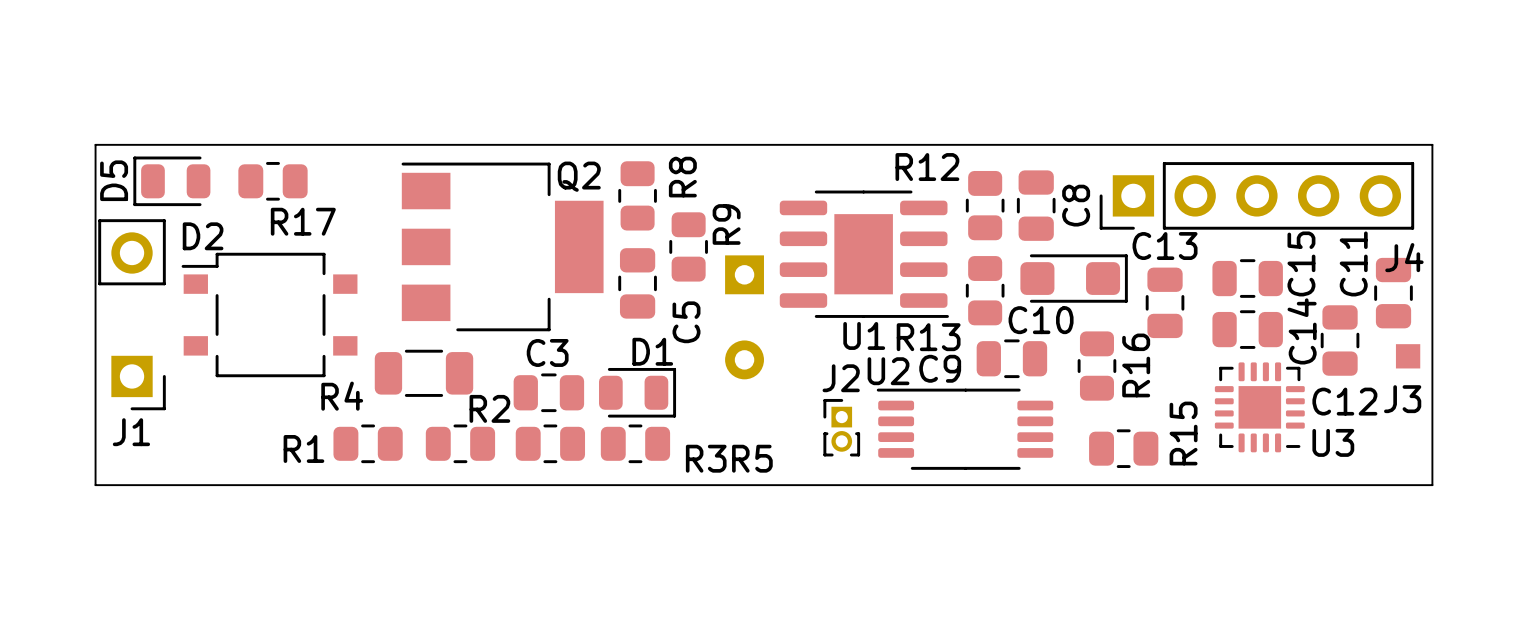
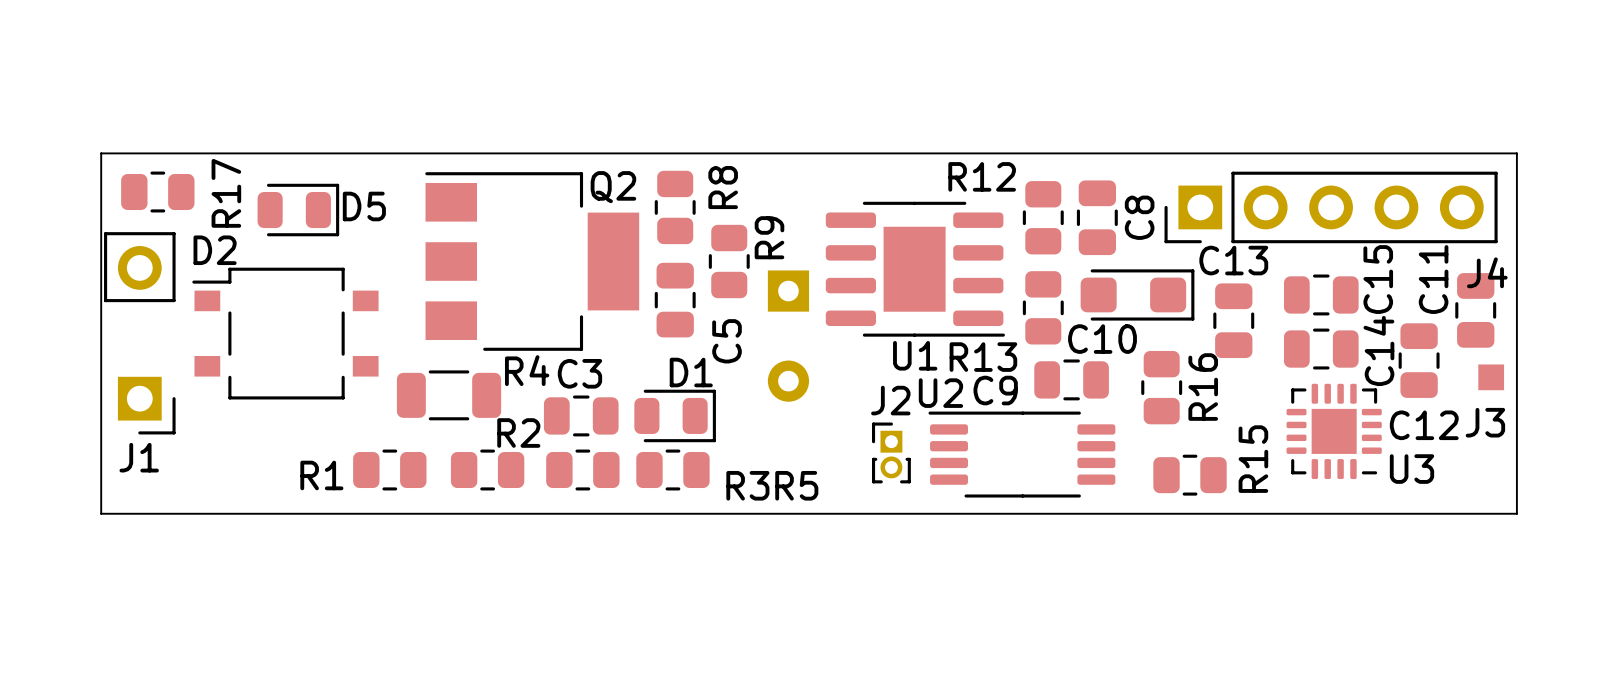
D5 rotation: 0° (171, 181) -> 180° (298, 210)
D5 position: (171, 181) -> (298, 210)
R17 position: (272, 181) -> (157, 192)
R17 name rotation: 0° (303, 221) -> 90° counterclockwise (226, 193)
R4 name position: R4 (342, 396) -> R4 (527, 370)

